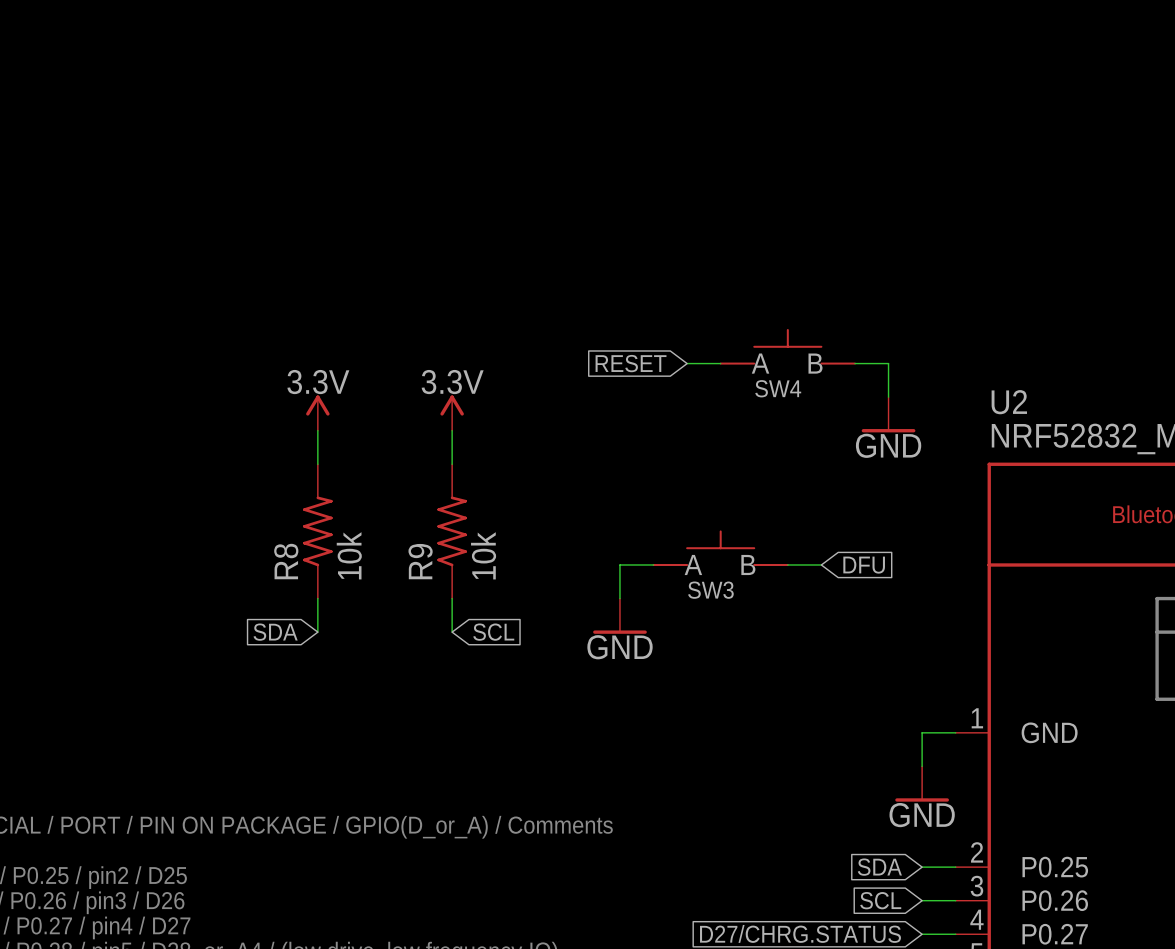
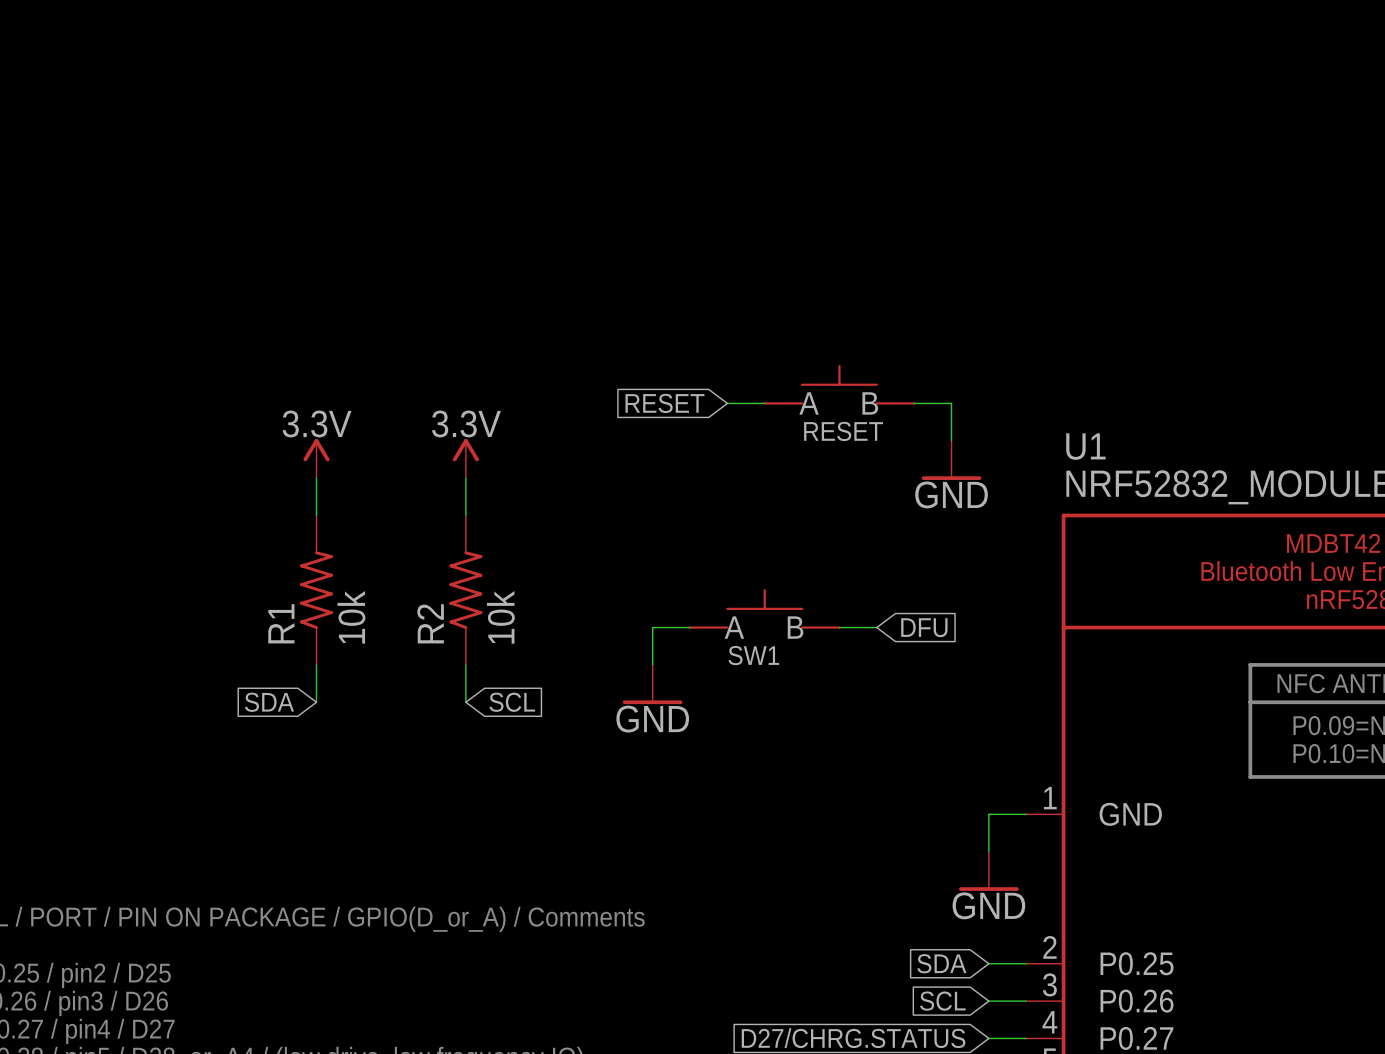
SW4 name: SW4 (778, 388) -> RESET (843, 431)
U2 name: U2 (1009, 402) -> U1 (1085, 446)
R8 name: R8 (286, 561) -> R1 (281, 623)
R9 name: R9 (420, 561) -> R2 (430, 623)
SW3 name: SW3 (710, 590) -> SW1 (753, 655)

